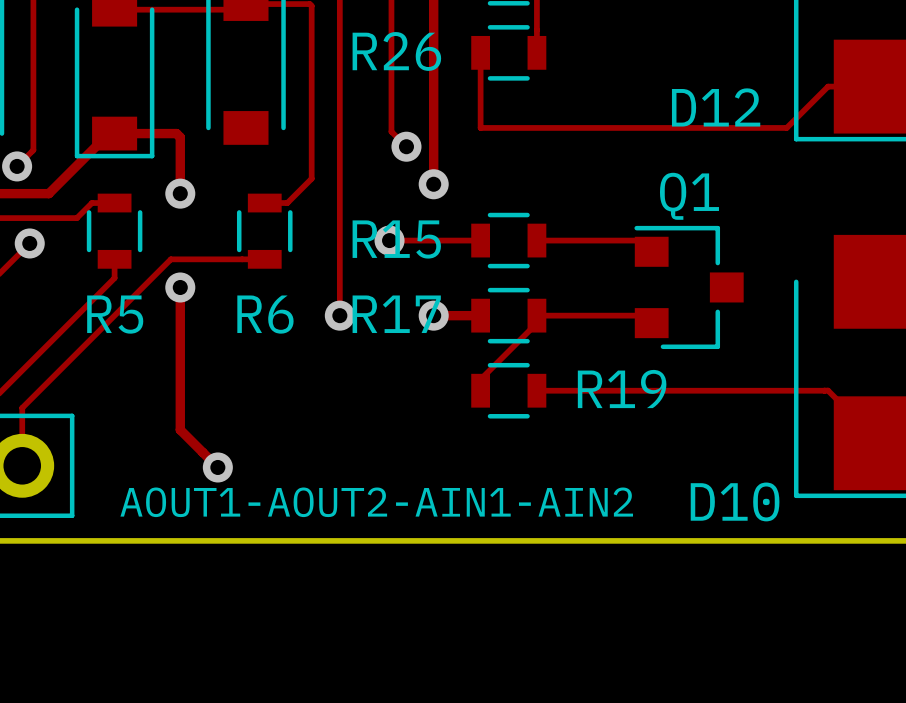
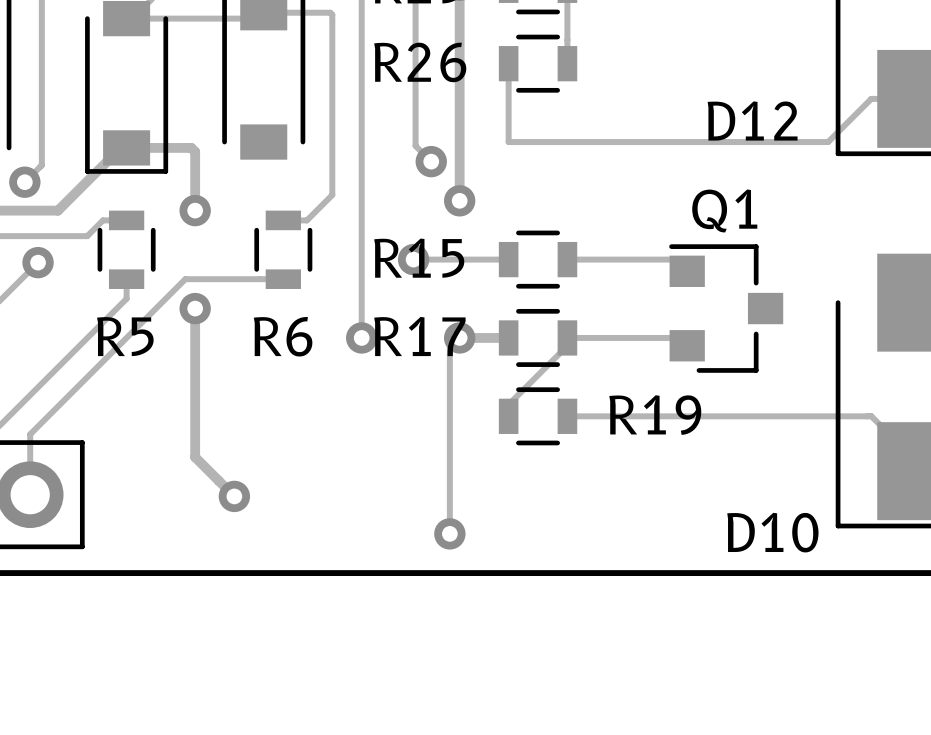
track: none -> (459, 337) (449, 347) (449, 533)
text: AOUT1-AOUT2-AIN1-AIN2 (376, 502) -> none
via: none -> (449, 533)

